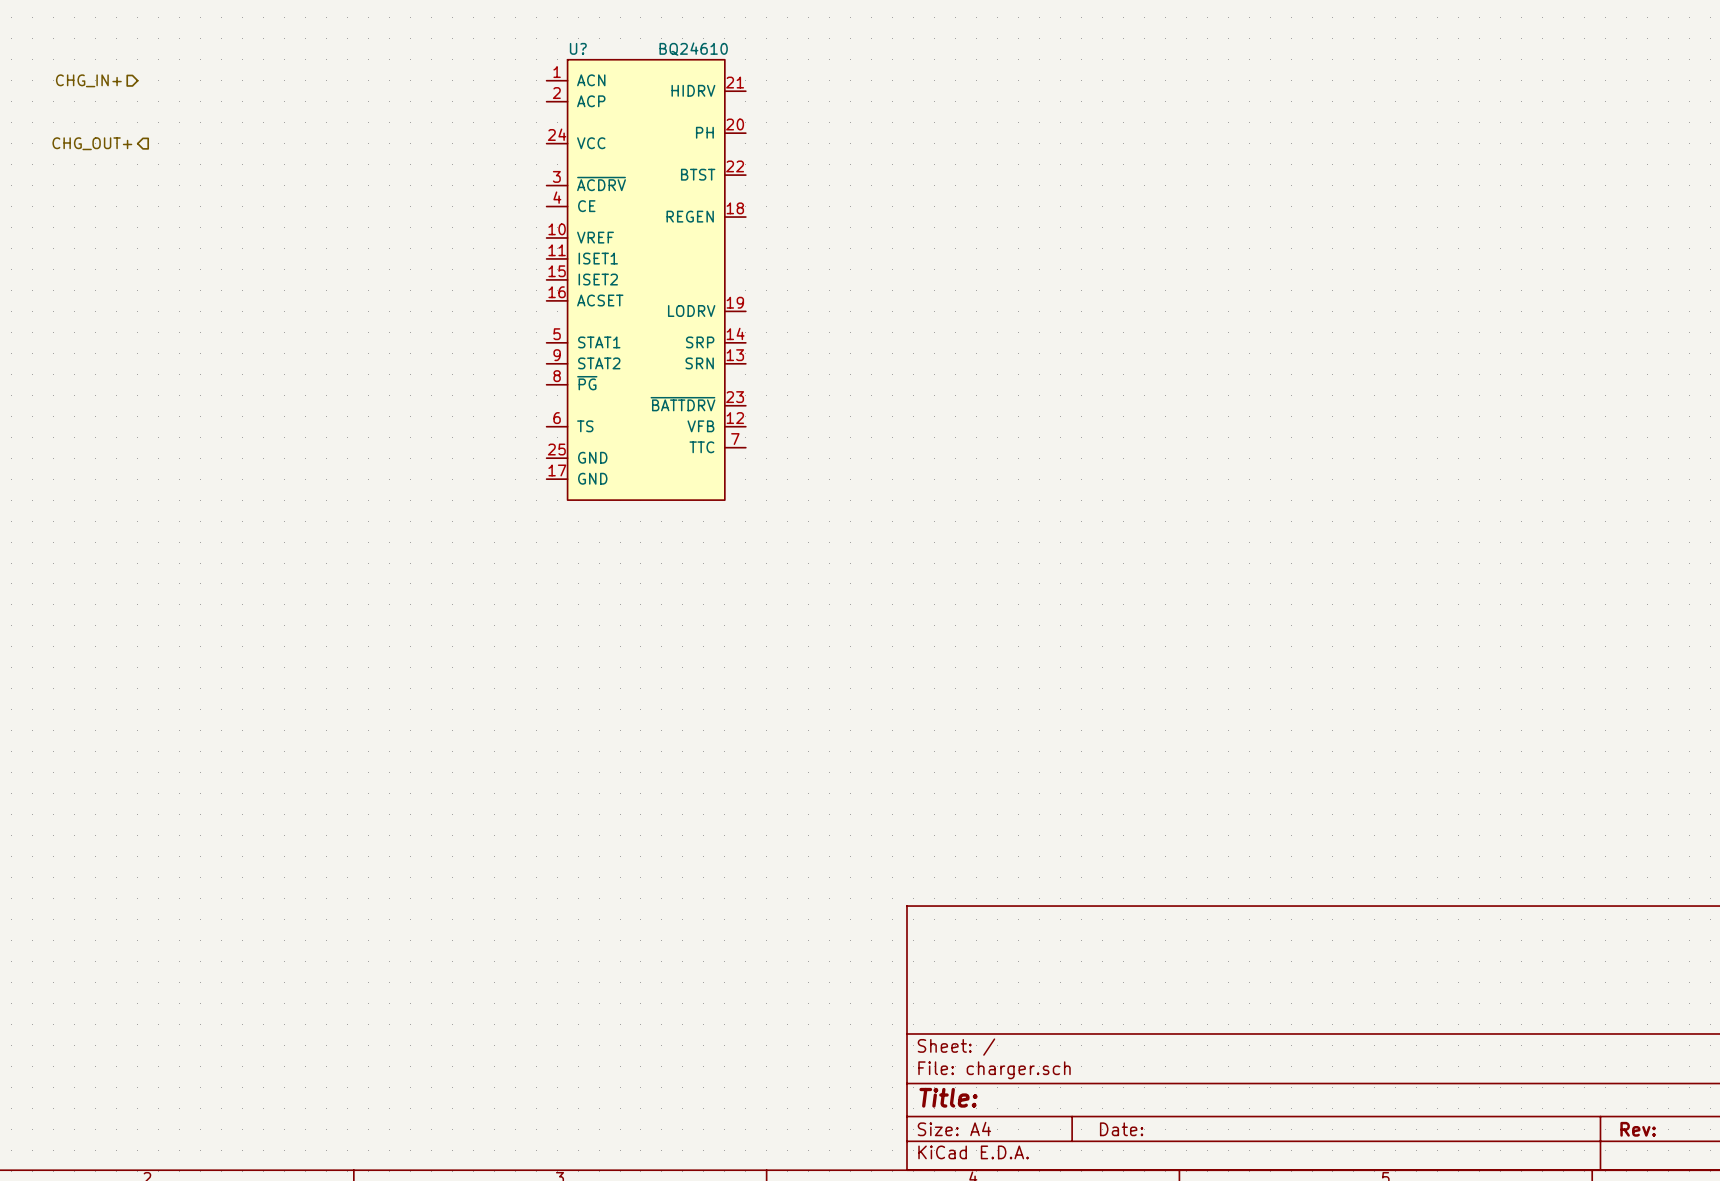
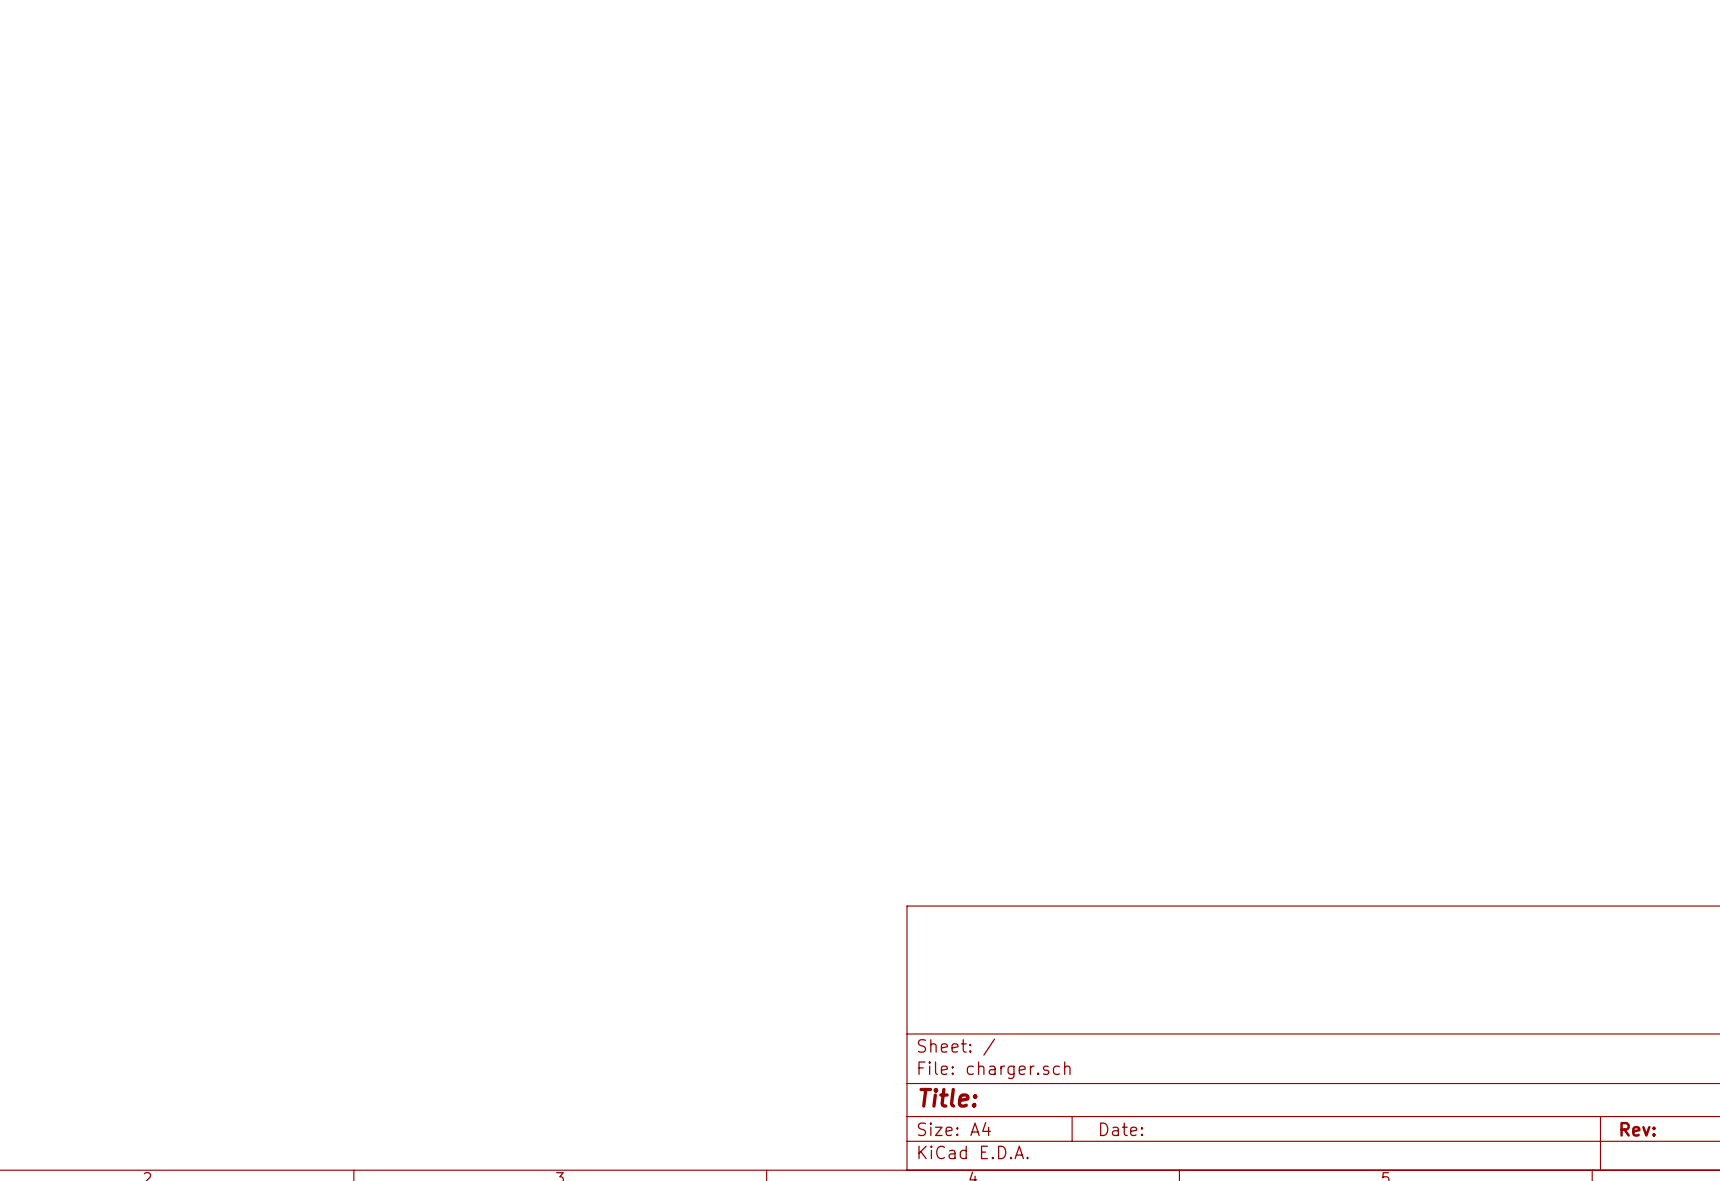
hierarchical label: CHG_IN+ (88, 80) -> none
hierarchical label: CHG_OUT+ (92, 143) -> none
U?: BQ24610 (646, 279) -> none

